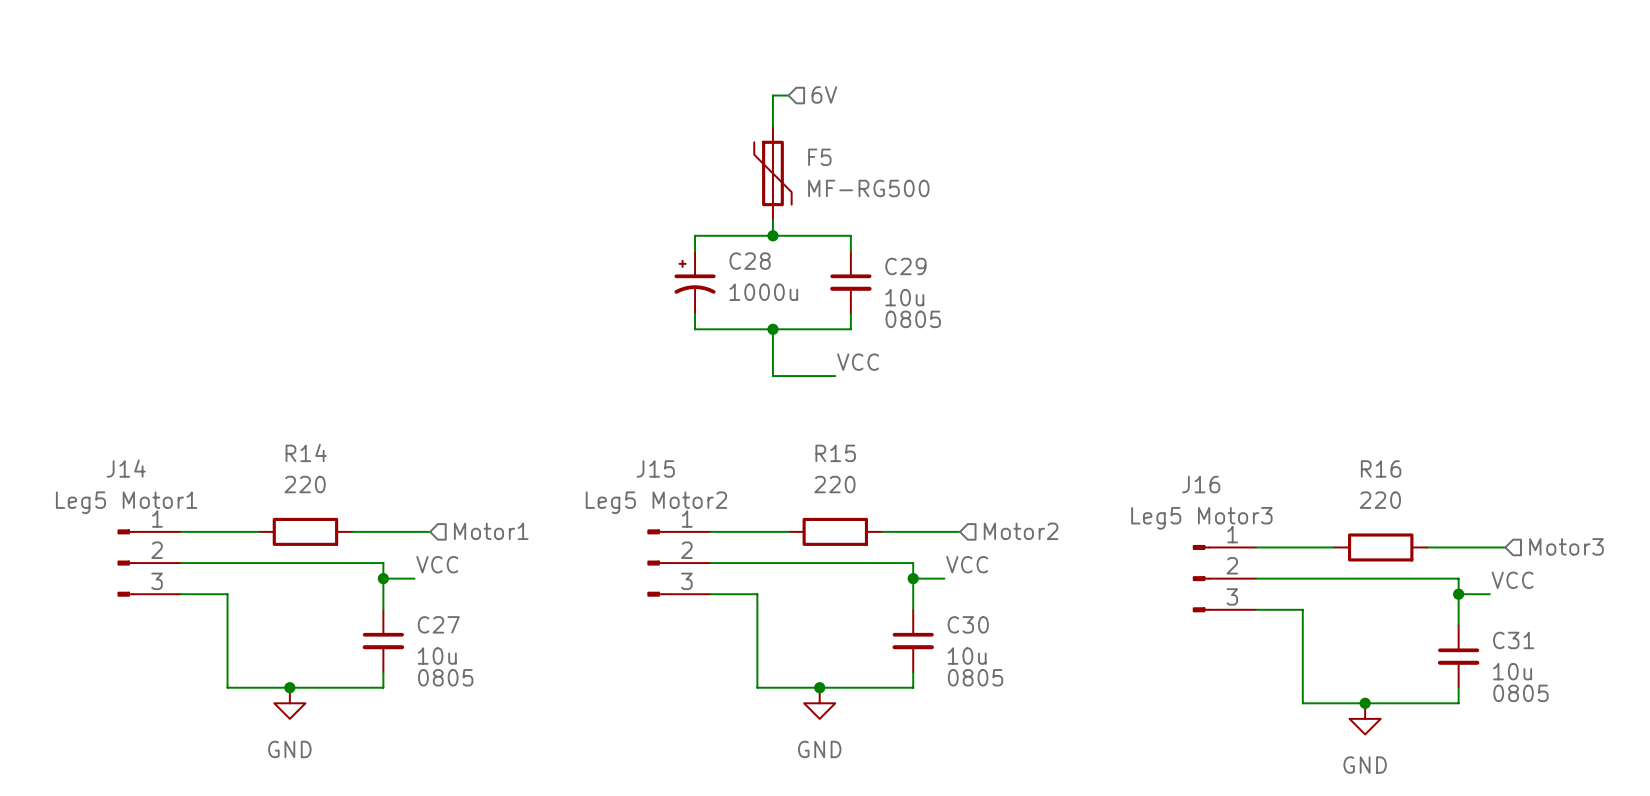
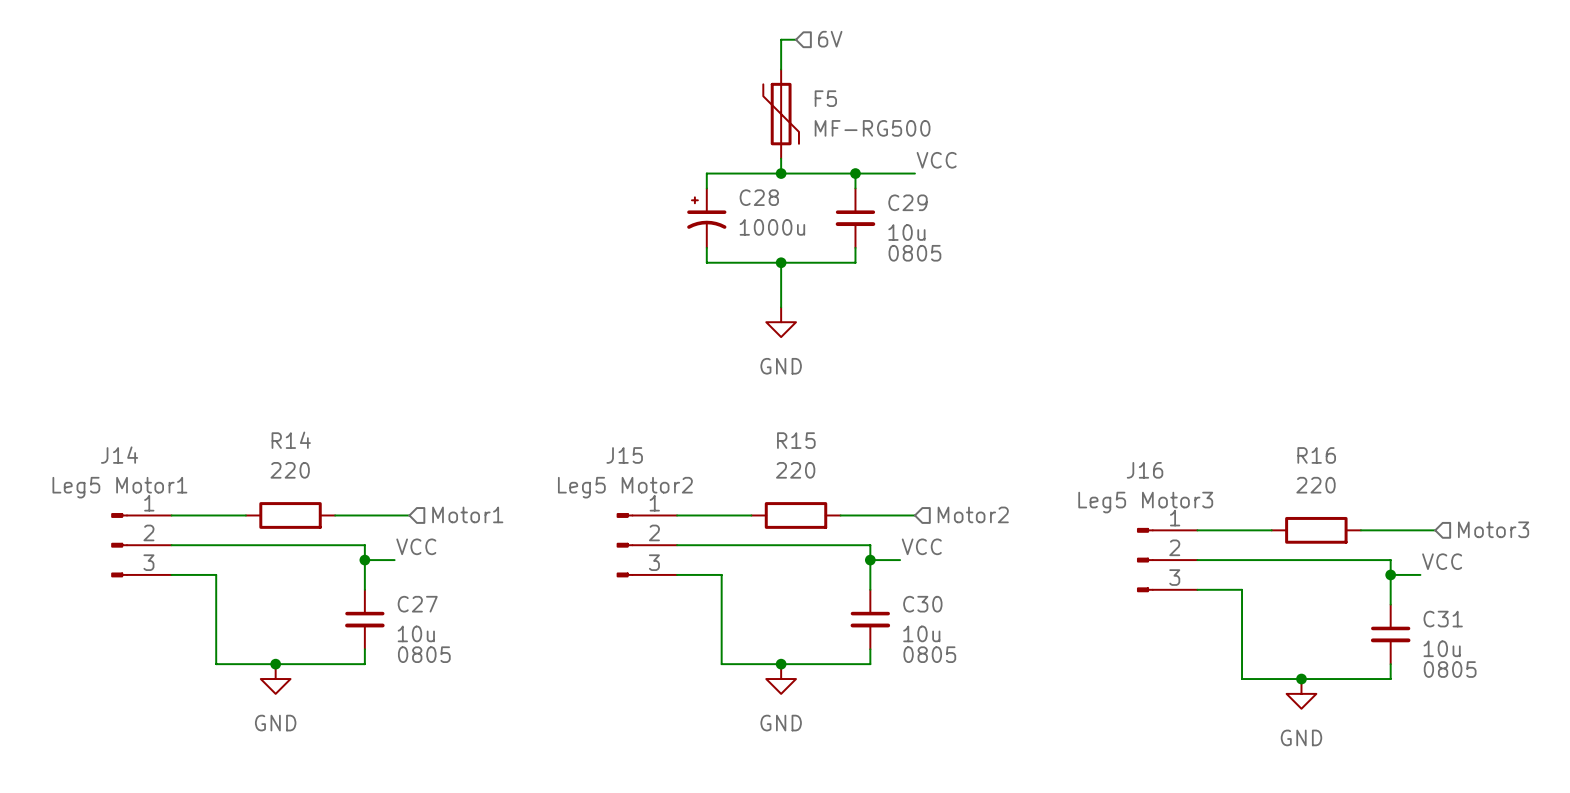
hierarchical label position: 6V (824, 94) -> 6V (830, 39)
wire: (788, 95) (772, 95) (772, 126) -> (796, 39) (781, 39) (781, 69)
F5 position: (772, 173) -> (781, 114)
junction: none -> (781, 173)
wire: none -> (855, 173) (855, 188)
junction: none -> (855, 173)
wire: none -> (914, 173) (706, 173) (706, 188)
wire: (772, 220) (772, 235) -> (781, 158) (781, 173)
junction: (772, 235) -> none
wire: (695, 251) (695, 235) (850, 235) (850, 251) -> none
wire: none -> (781, 262) (781, 307)
junction: none -> (781, 262)
C28 position: (695, 282) -> (706, 218)
C29 position: (850, 282) -> (855, 218)
wire: (695, 313) (695, 329) (850, 329) (850, 313) -> (706, 247) (706, 262) (855, 262) (855, 247)
wire: (772, 329) (772, 376) (835, 376) -> none
junction: (772, 329) -> none
power symbol: none -> GND (781, 322)
label position: VCC (858, 362) -> VCC (936, 160)

